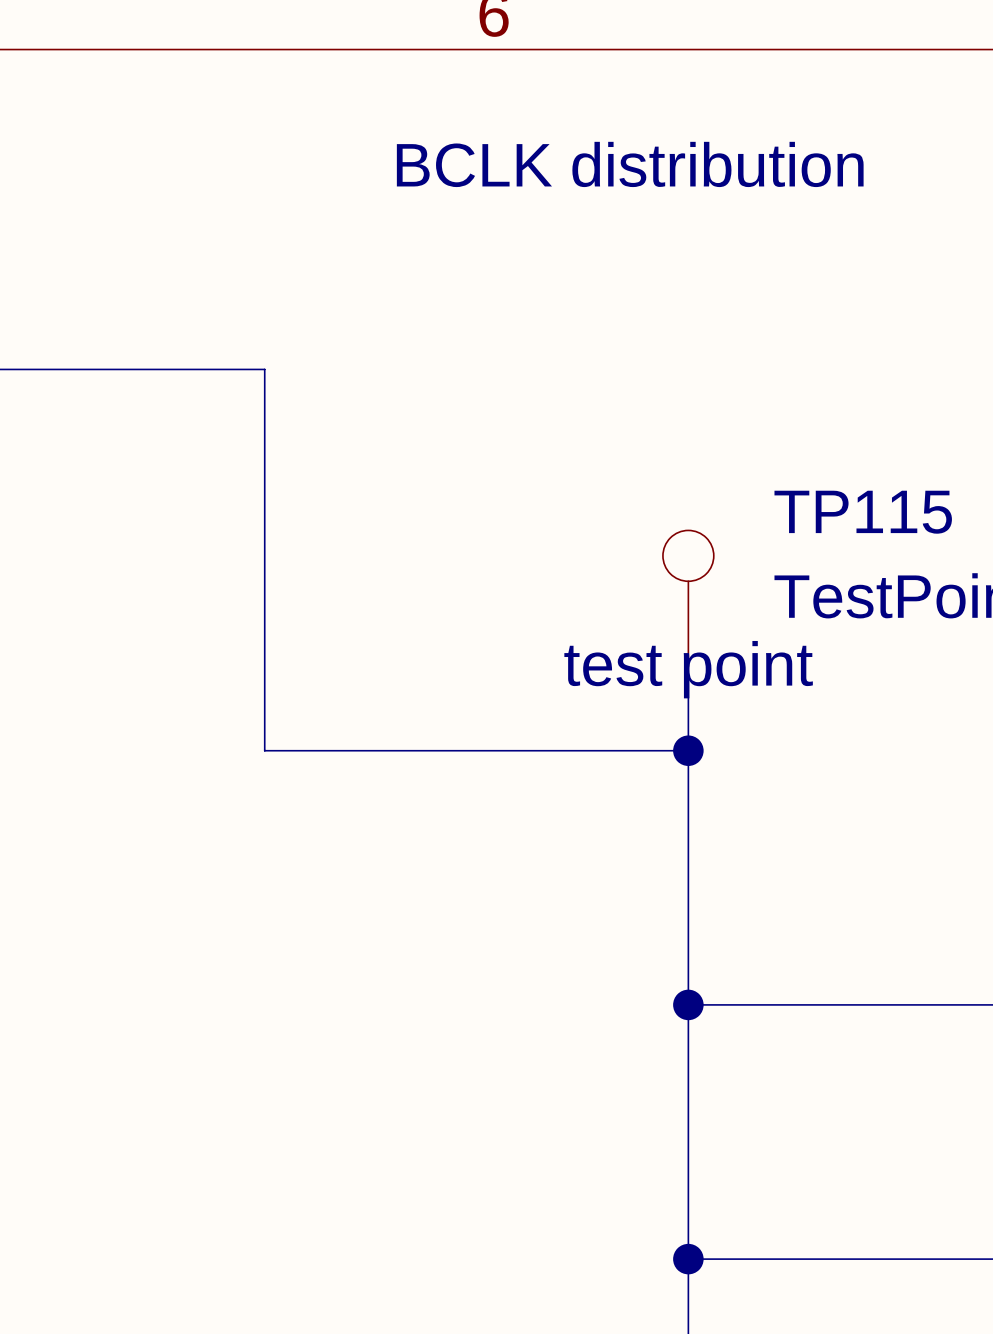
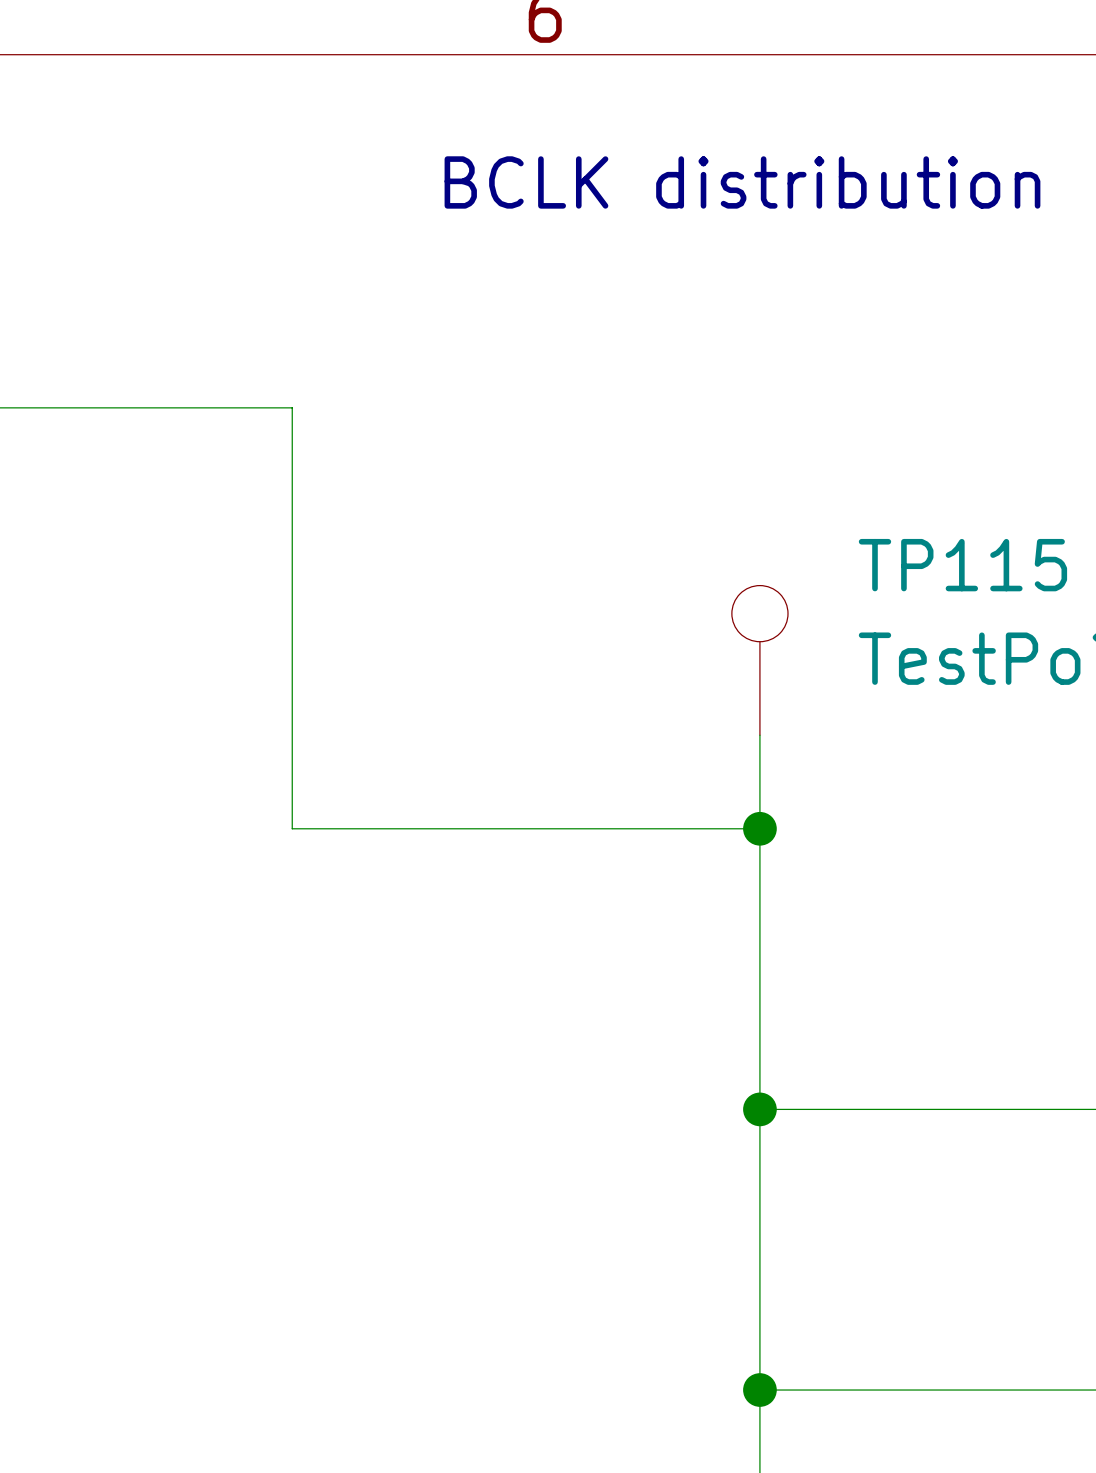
TP115 text: test point (688, 669) -> none

